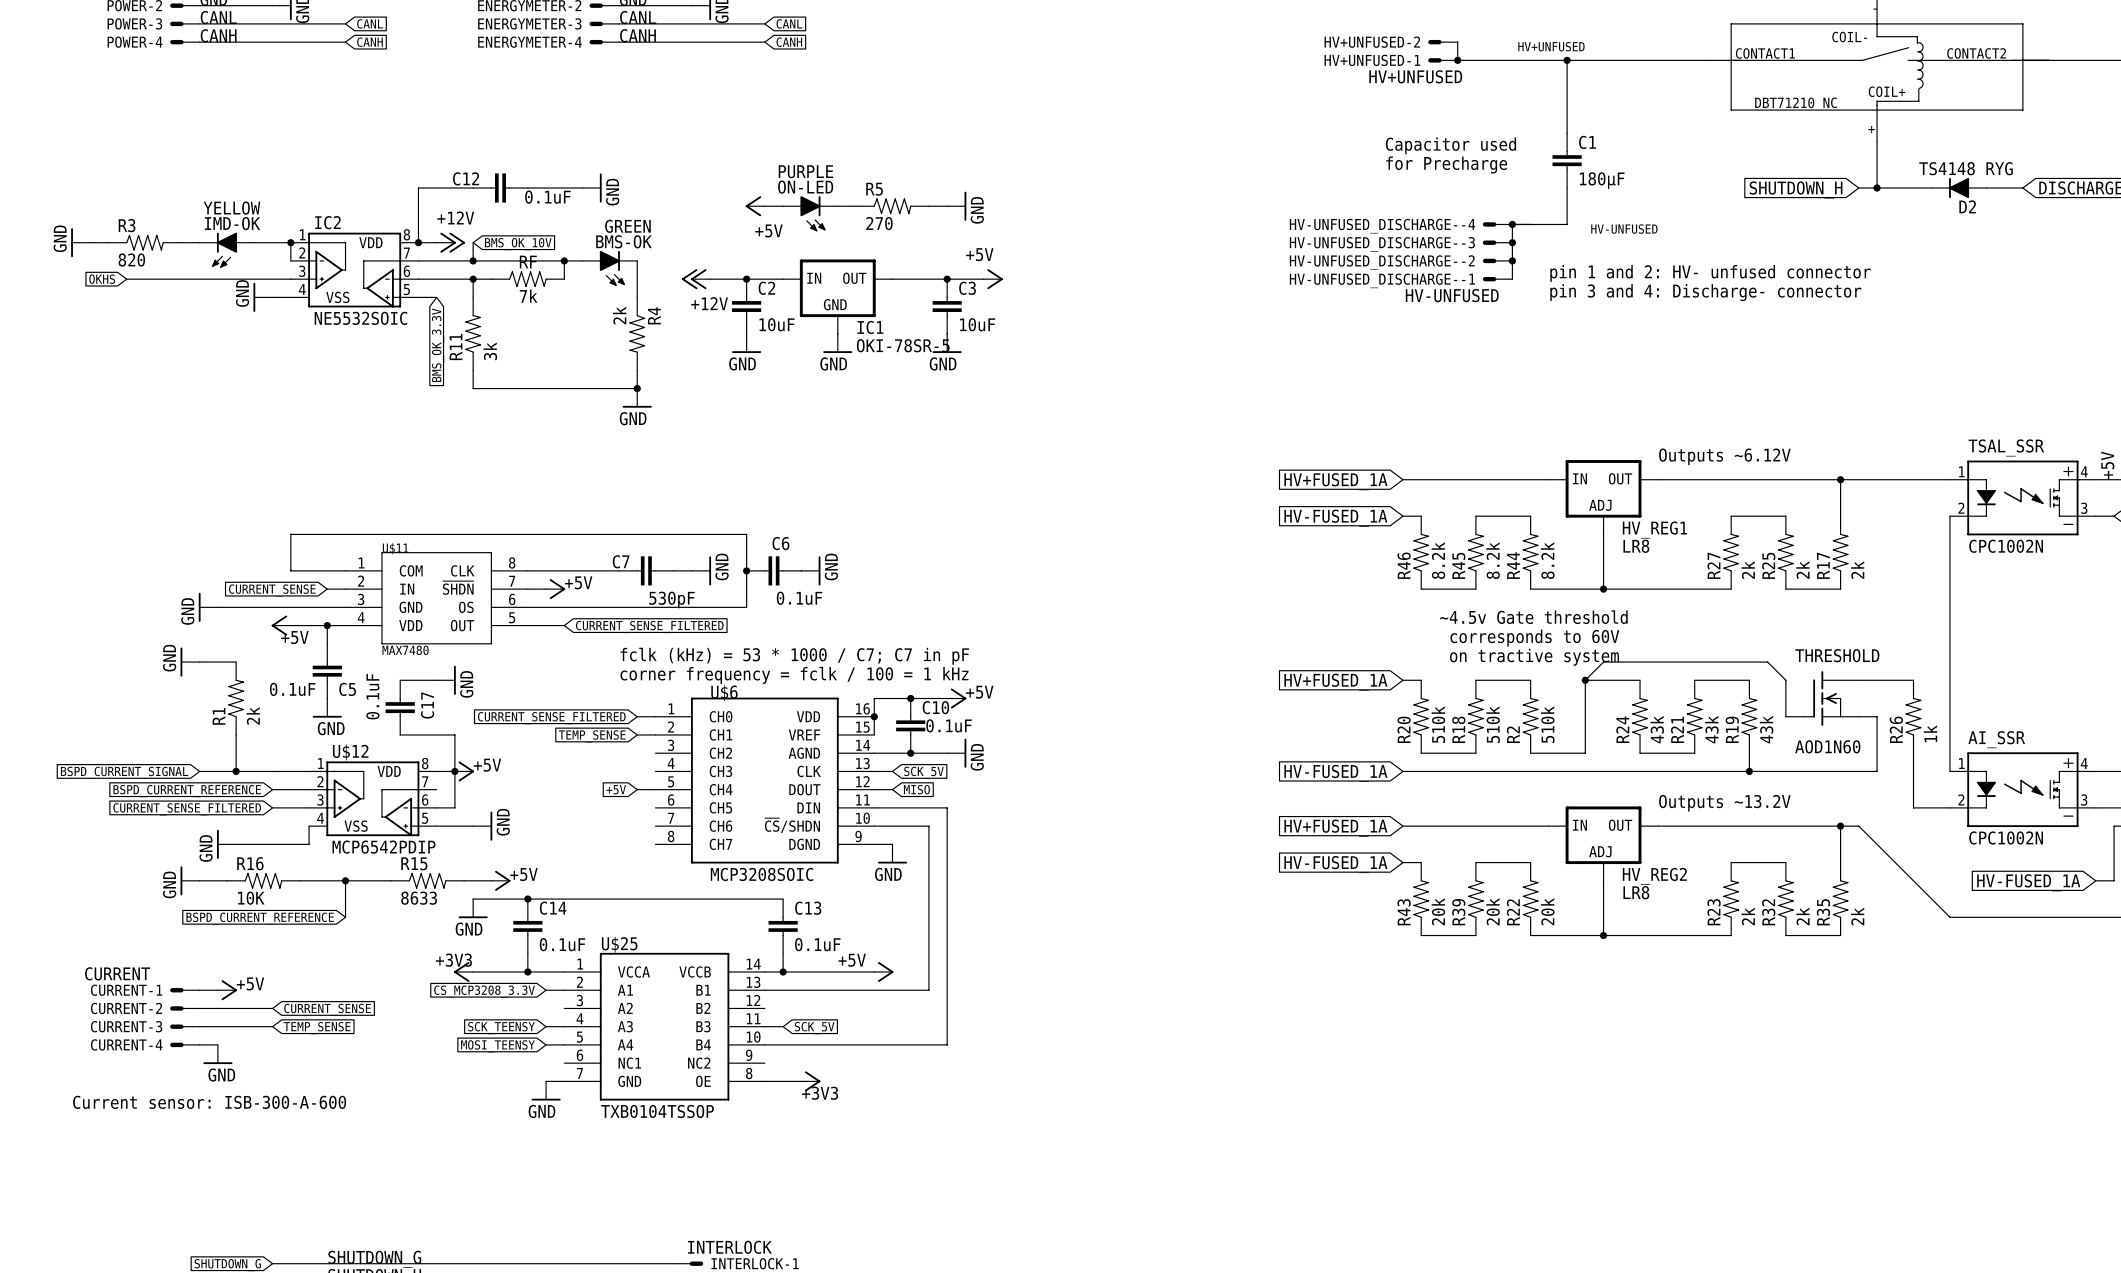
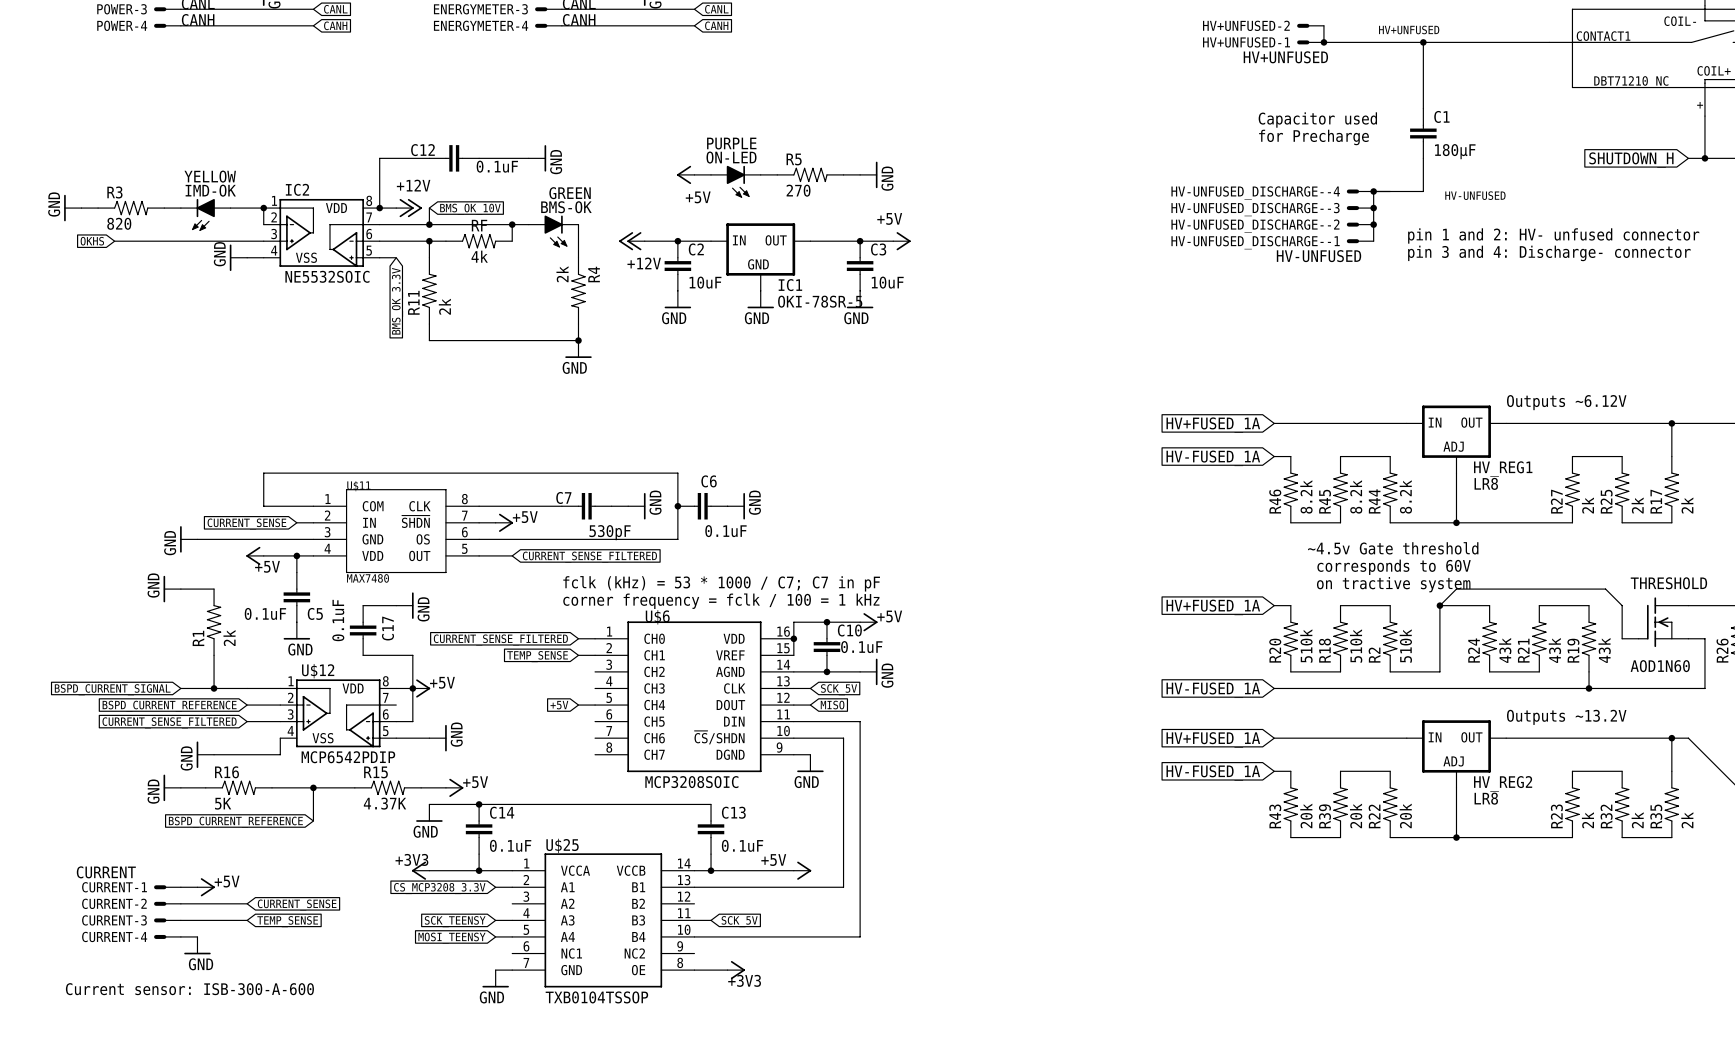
RF value: 7k (528, 296) -> 4k (479, 256)
R11 value: 3k (490, 351) -> 2k (444, 306)
R16 value: 10K (251, 898) -> 5K (223, 803)
R15 value: 8633 (419, 898) -> 4.37K (385, 803)

